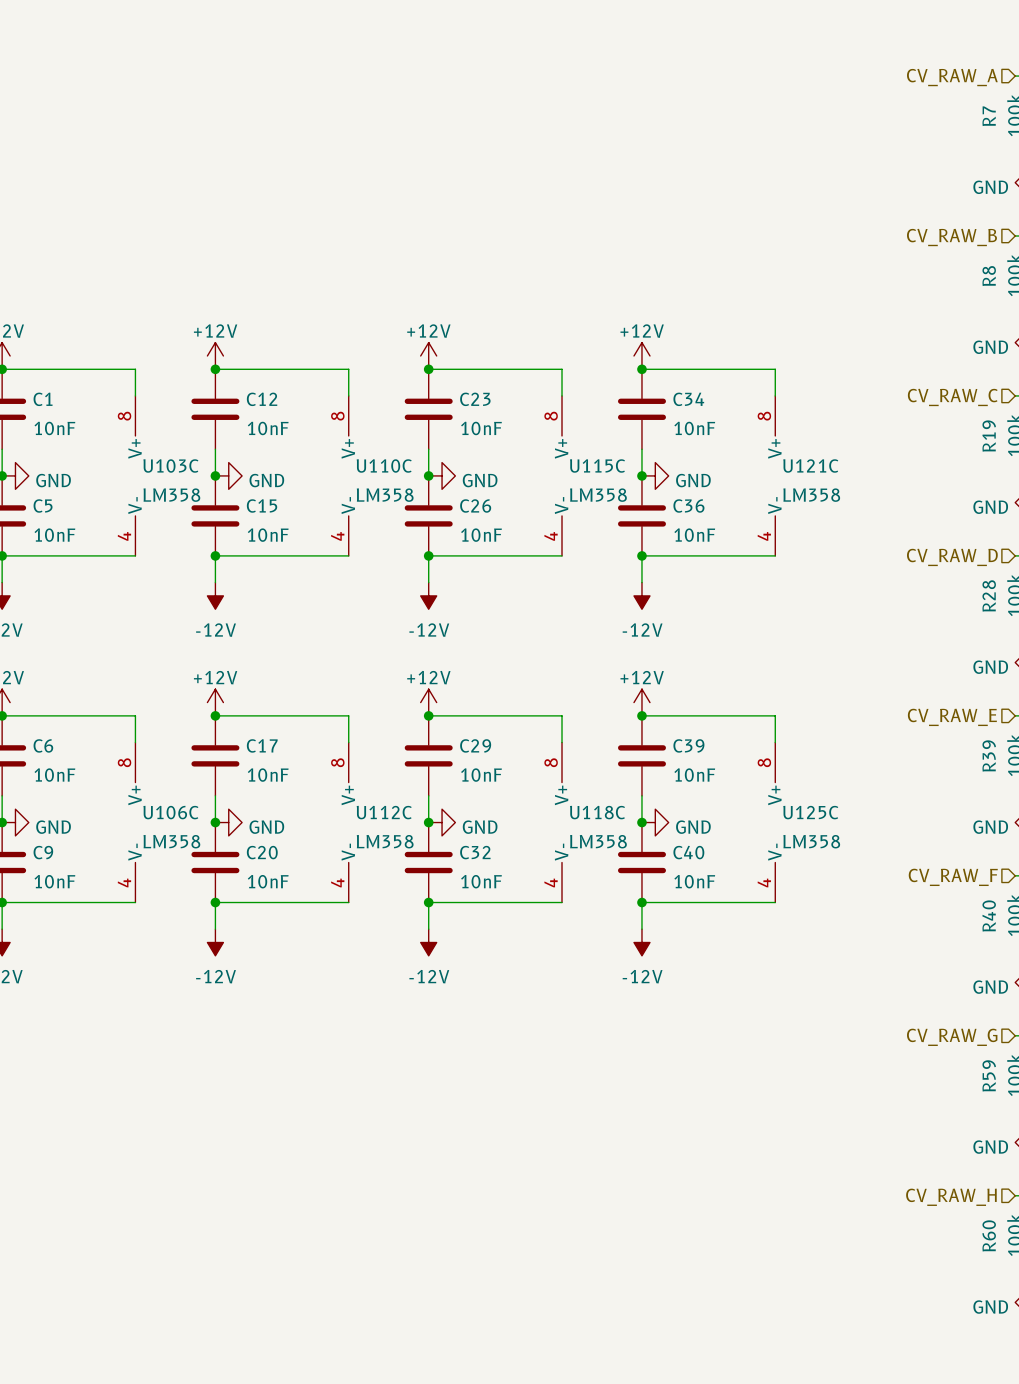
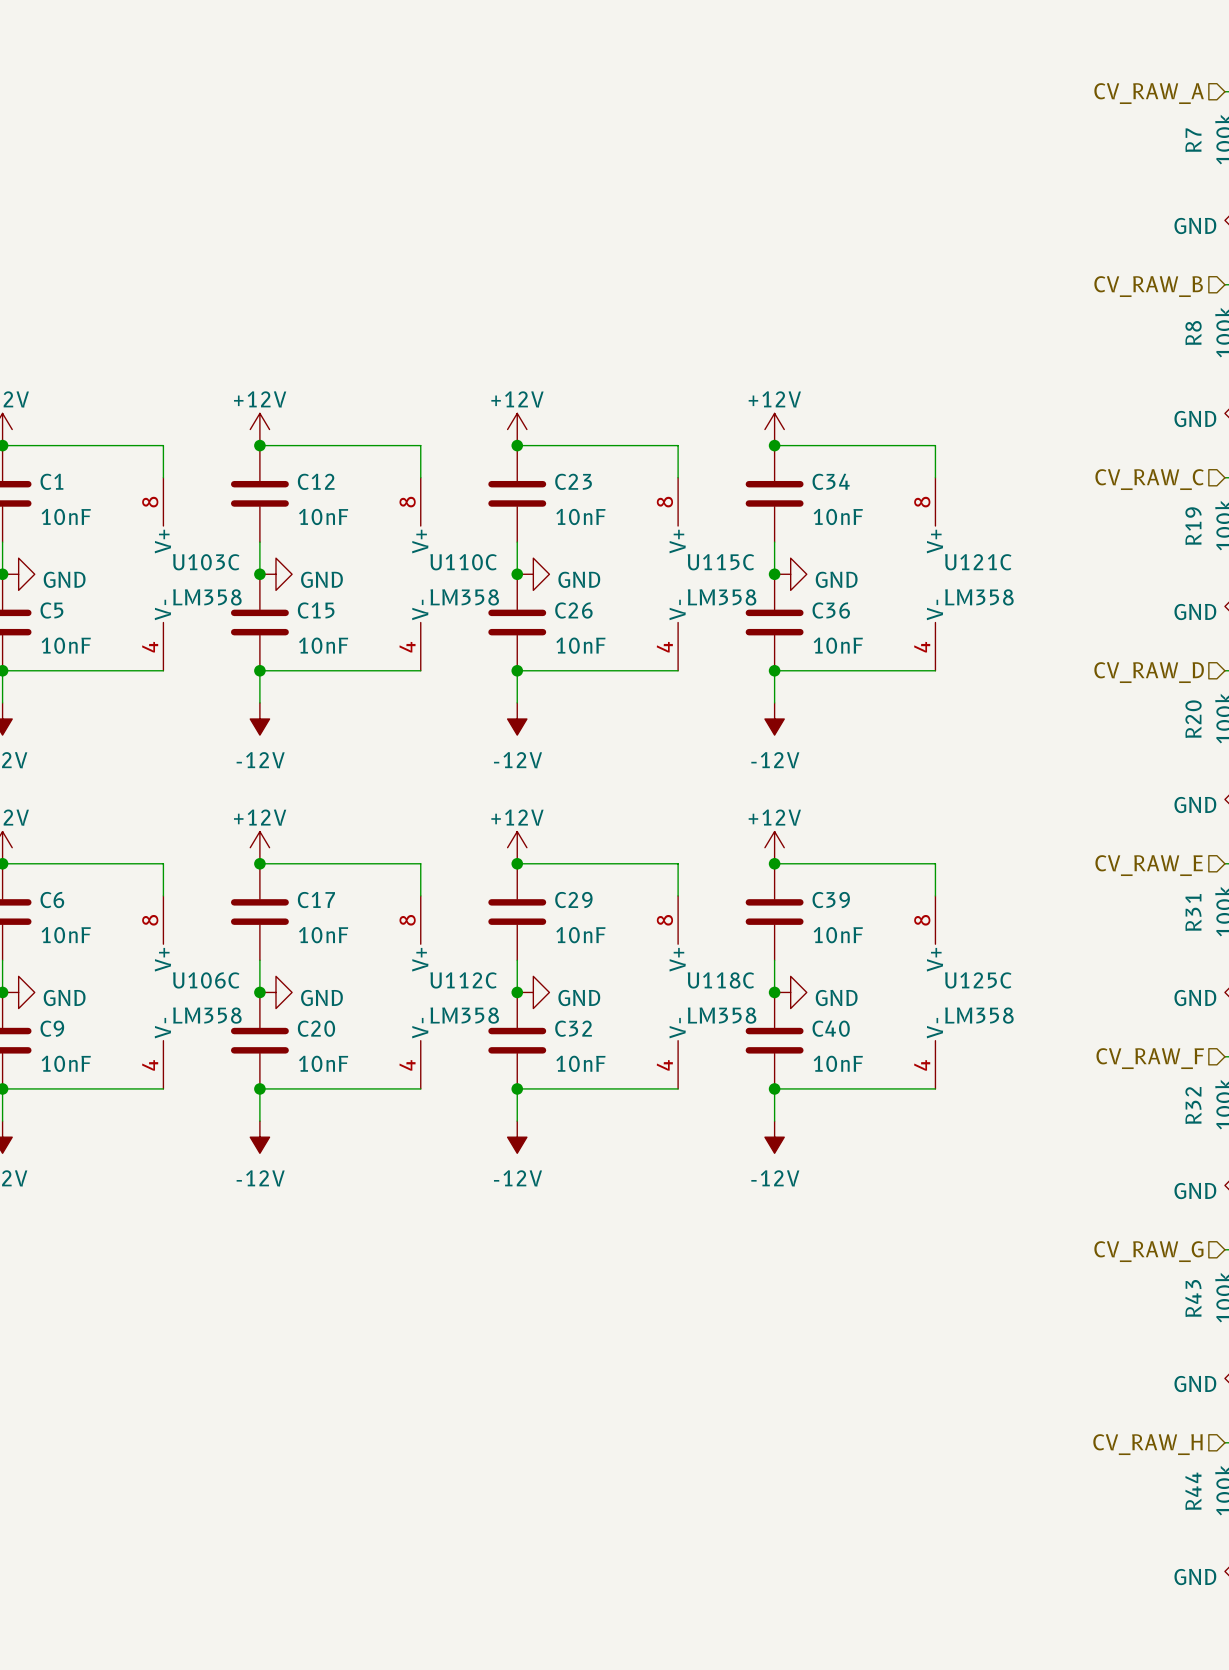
R28 name: R28 (989, 595) -> R20 (1193, 719)
R39 name: R39 (989, 755) -> R31 (1193, 912)
R40 name: R40 (989, 916) -> R32 (1193, 1105)
R59 name: R59 (989, 1075) -> R43 (1193, 1298)
R60 name: R60 (989, 1235) -> R44 (1193, 1491)

